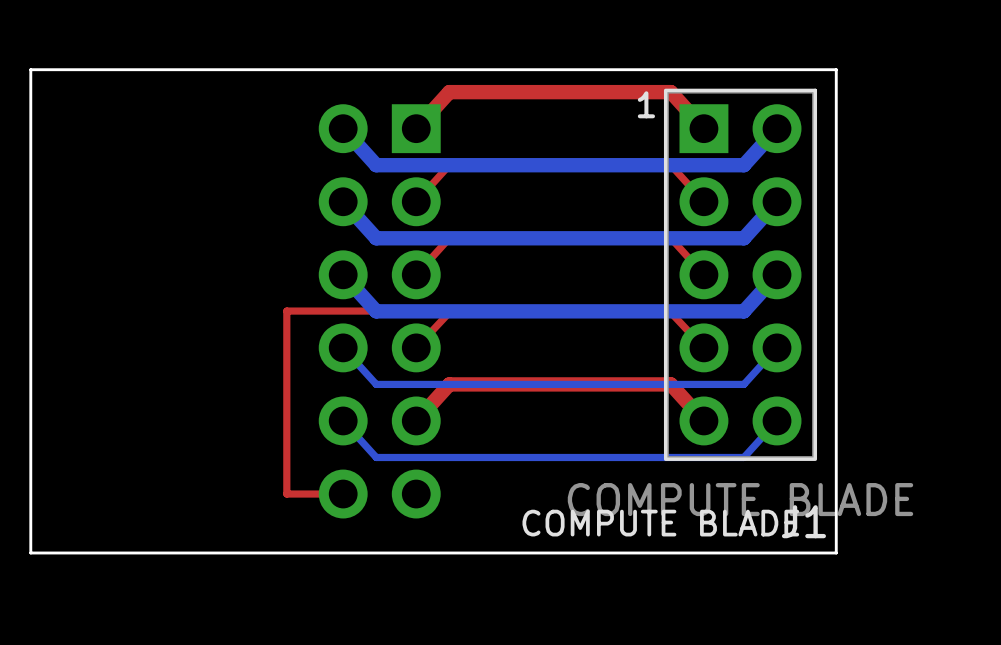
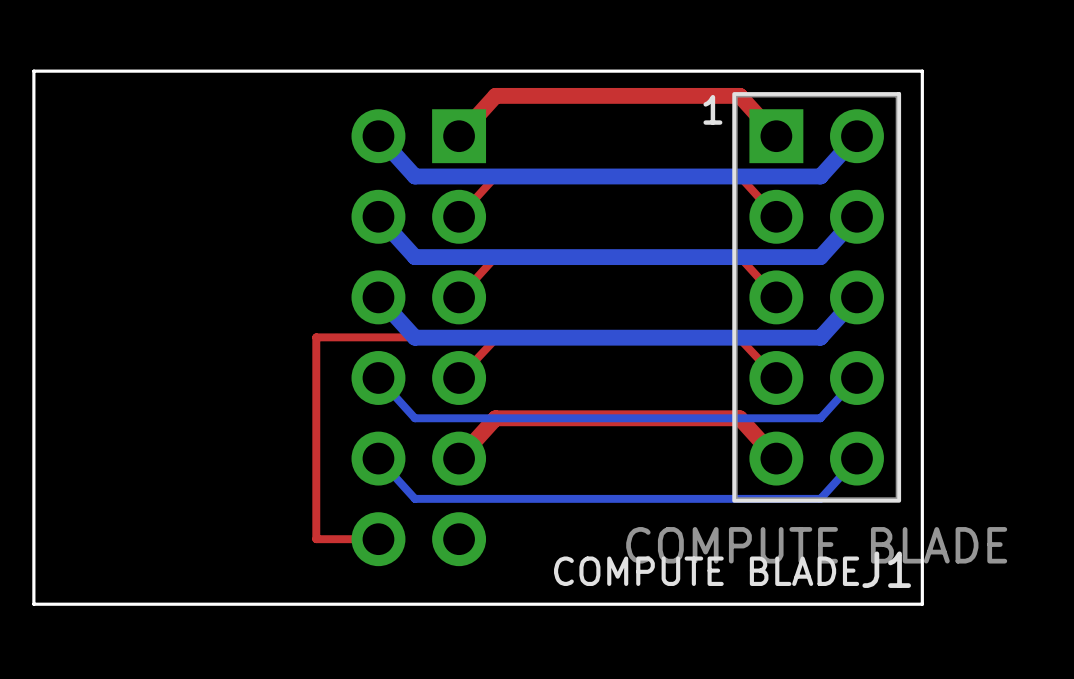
text position: COMPUTE BLADE (660, 523) -> COMPUTE BLADE (706, 571)

